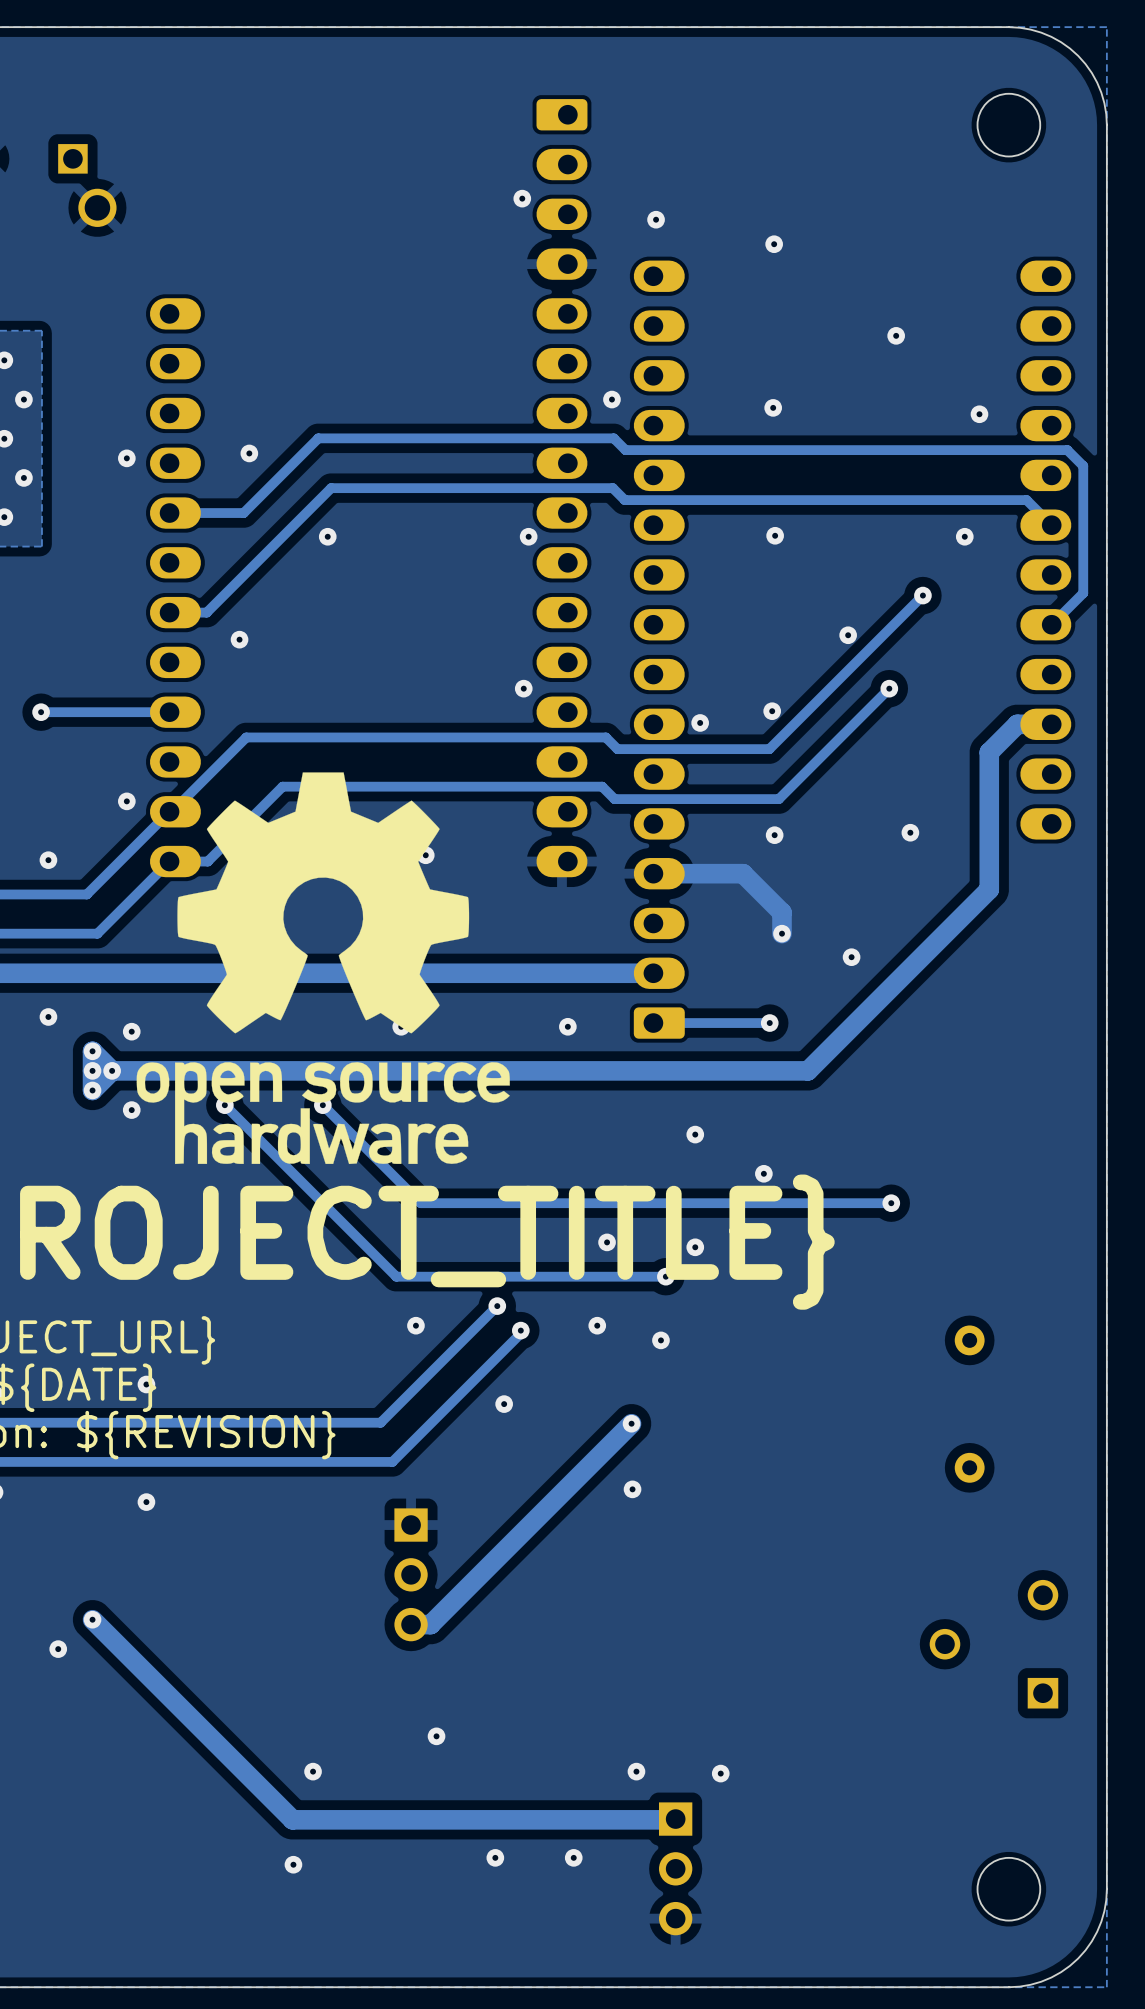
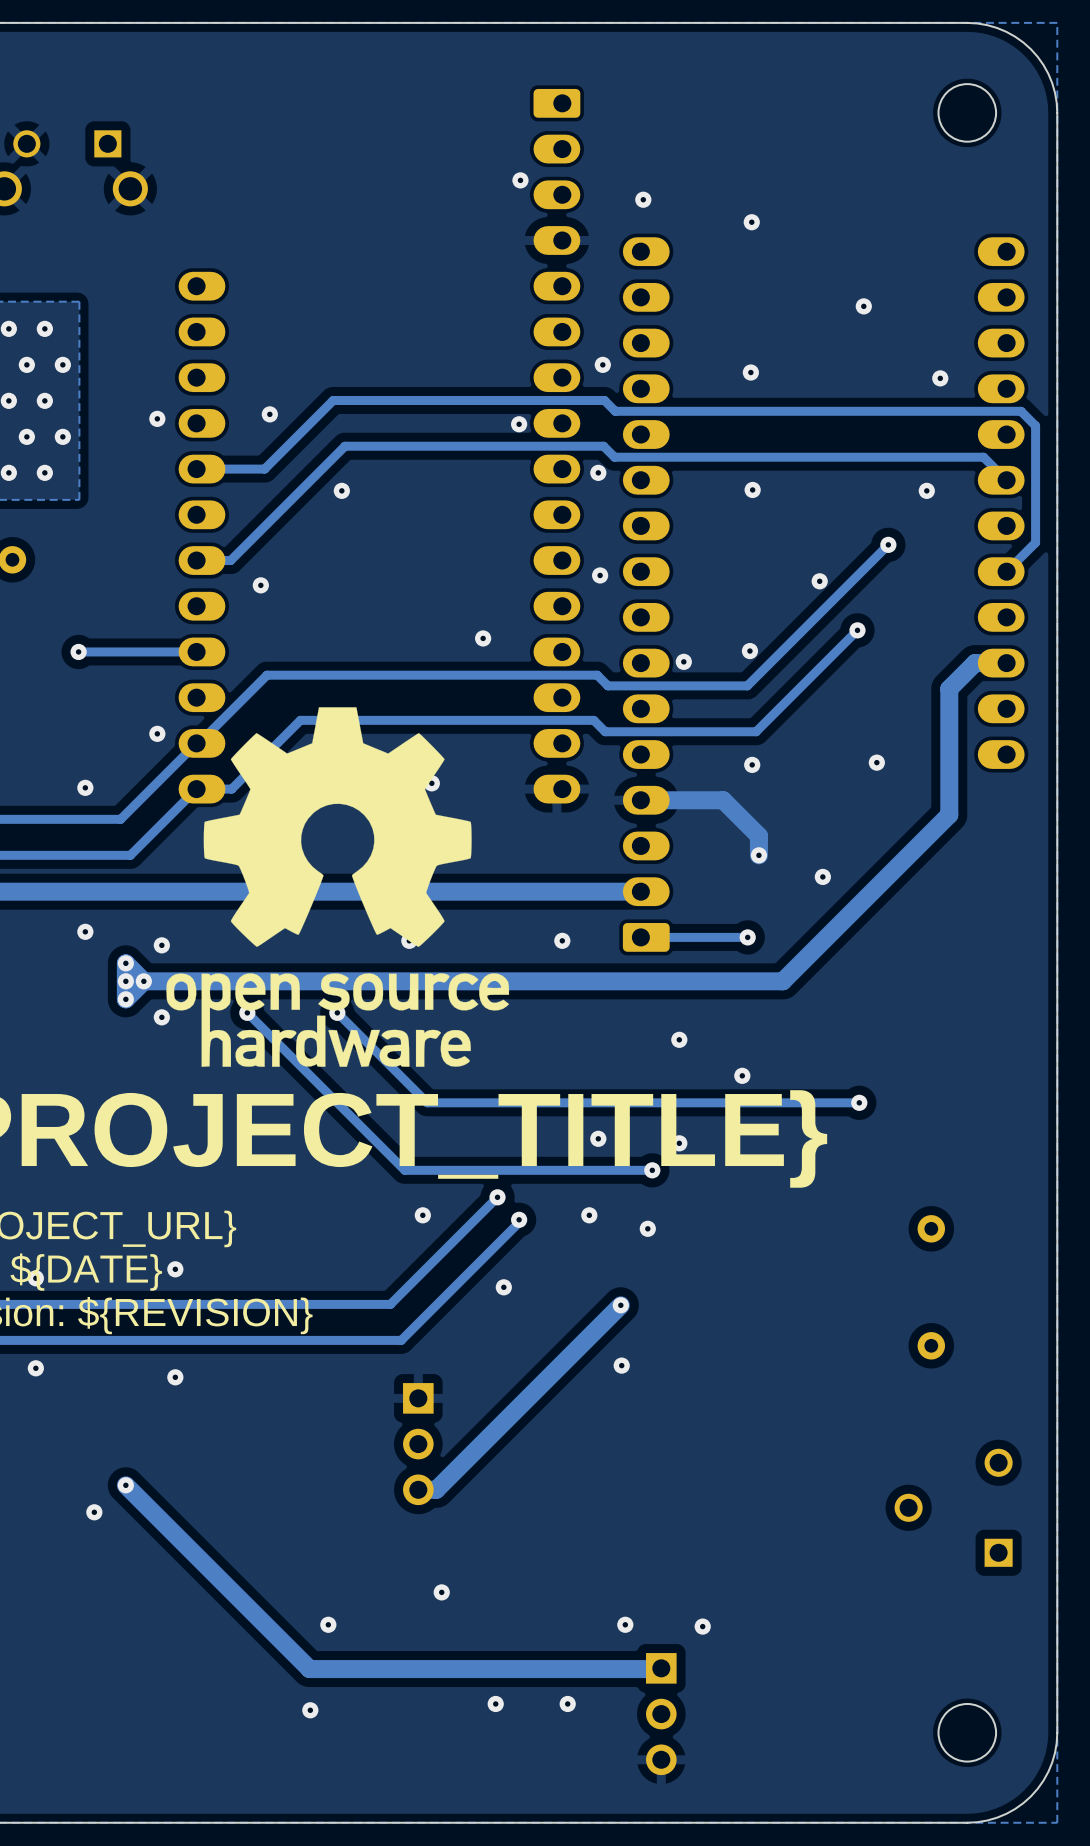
via: none -> (519, 424)
via: none -> (598, 472)
via: (528, 536) -> none
via: none -> (600, 575)
via position: (523, 688) -> (483, 638)

